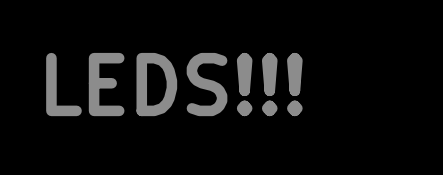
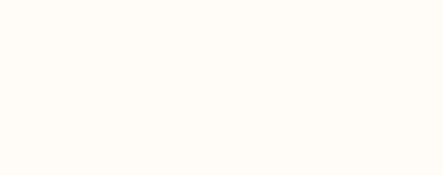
text: LEDS!!! (174, 84) -> none

